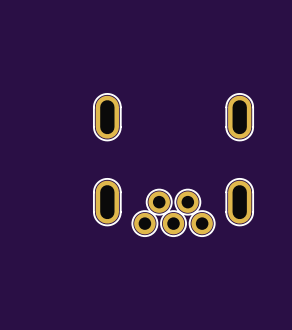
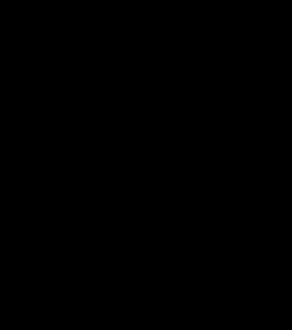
part: (173, 165) -> none

